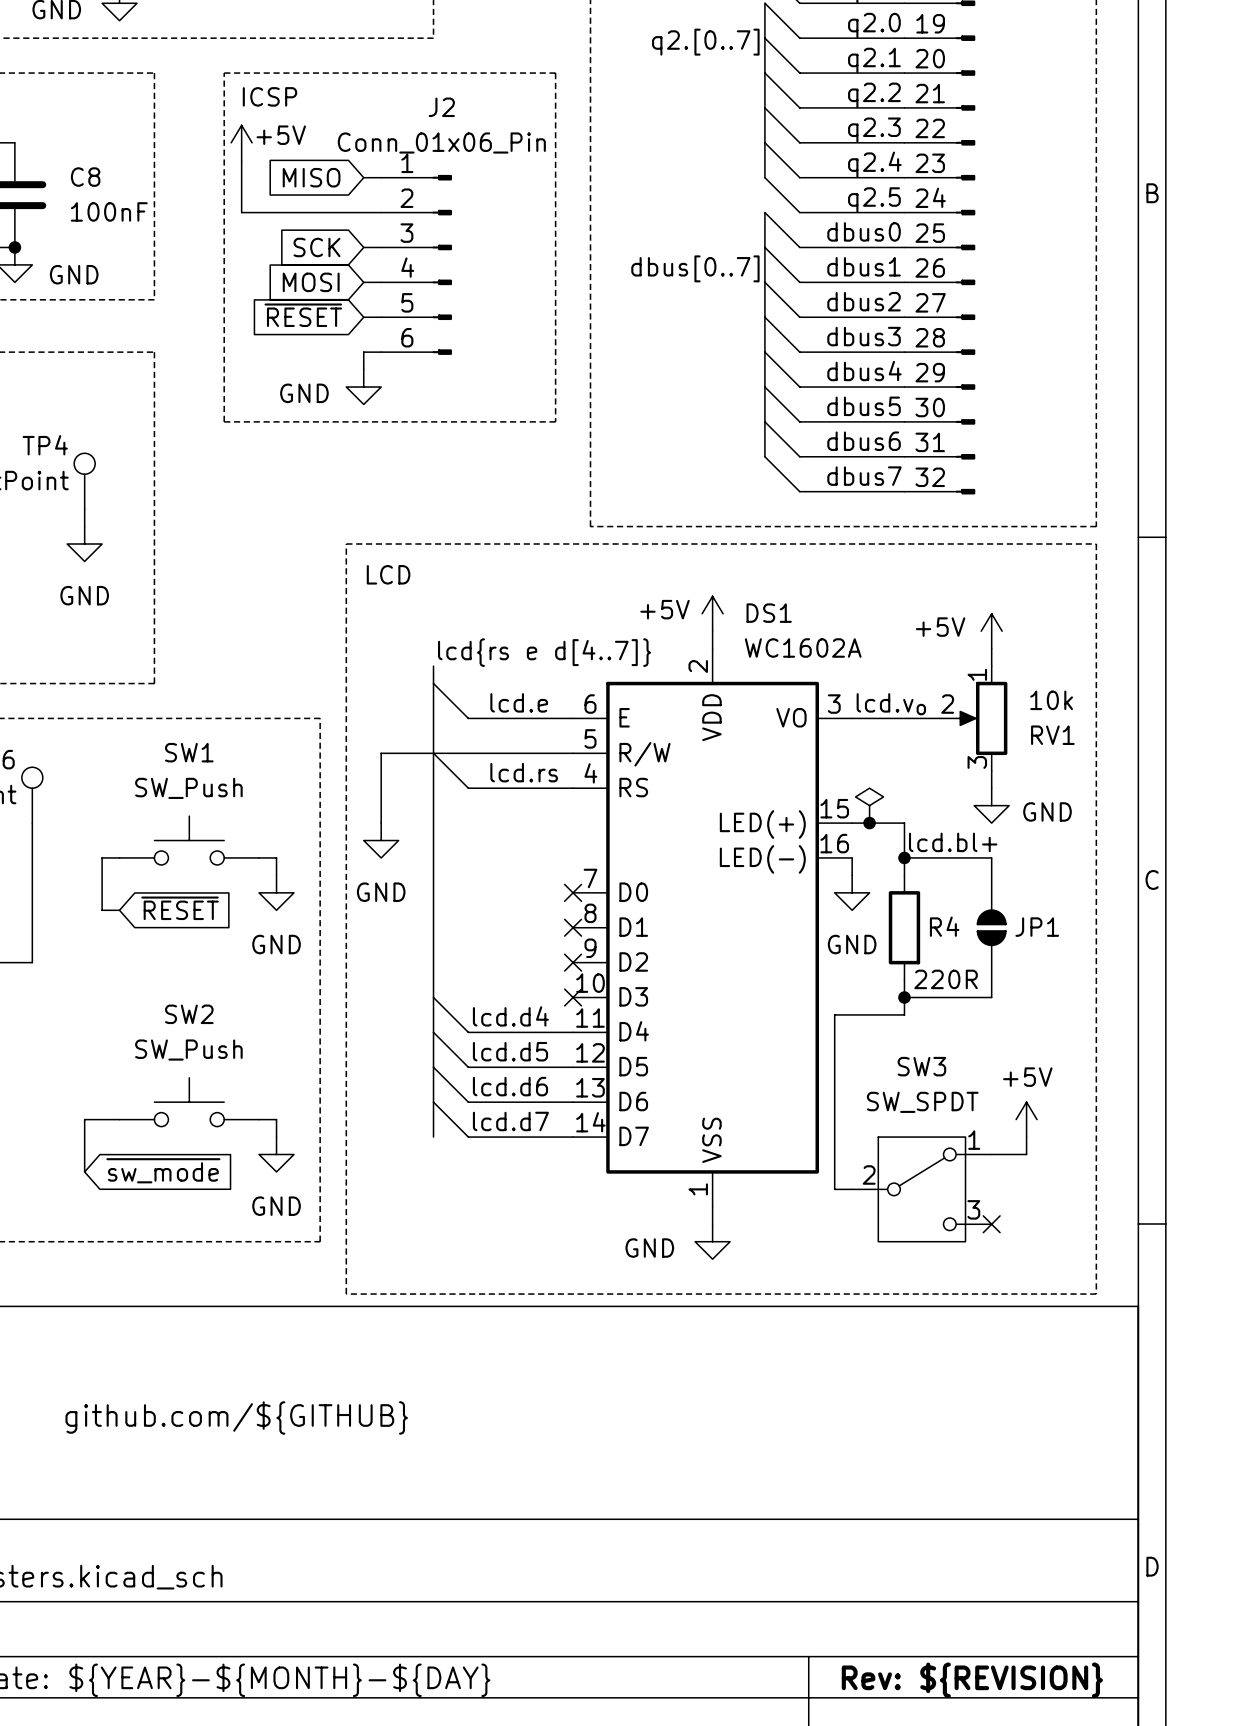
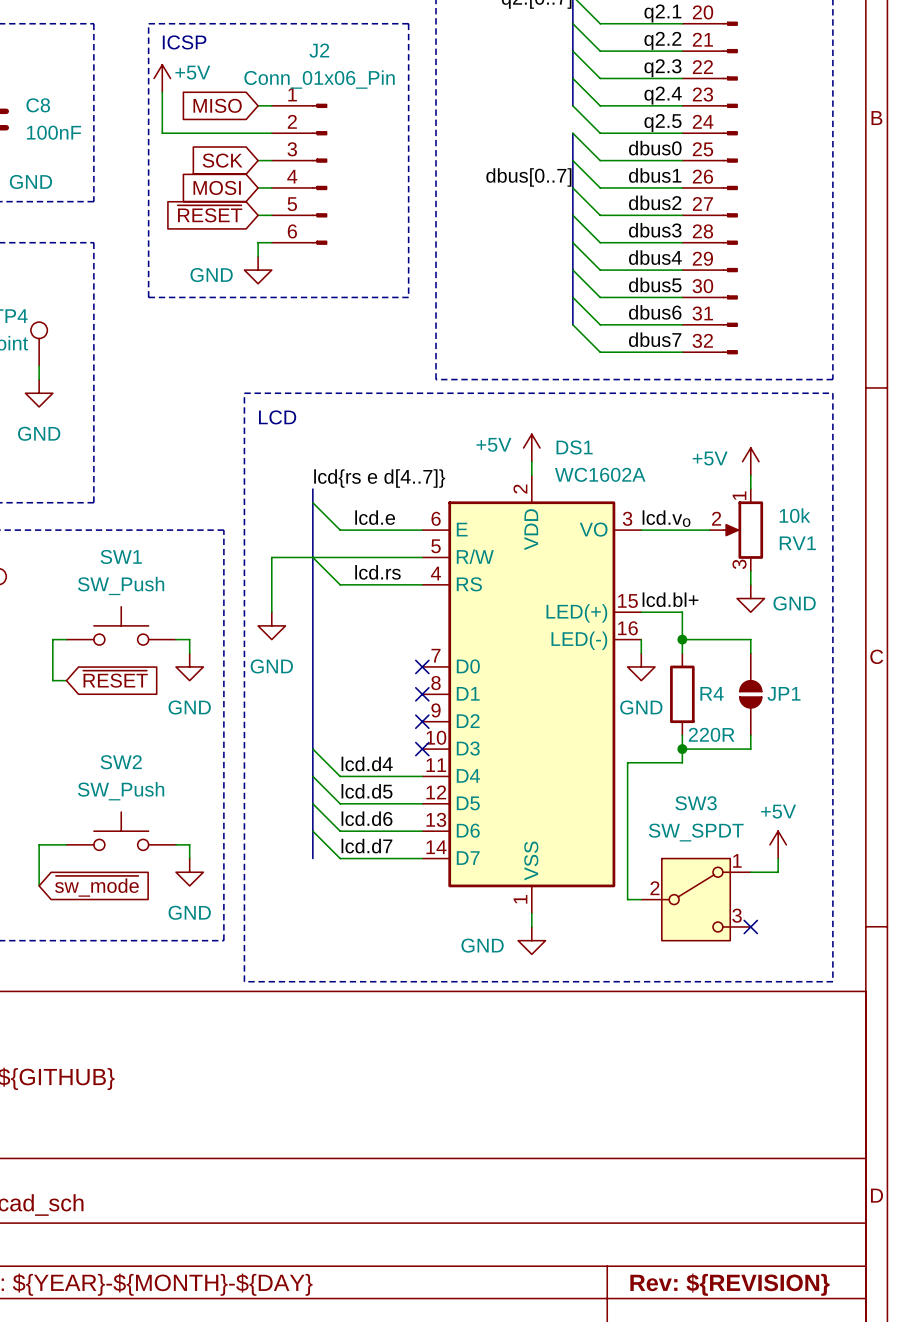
power symbol: (869, 805) -> none
junction: (869, 823) -> none
label position: lcd.bl+ (953, 842) -> lcd.bl+ (670, 599)
JP1 symbol: [976, 857, 1007, 998] -> [739, 653, 762, 736]

